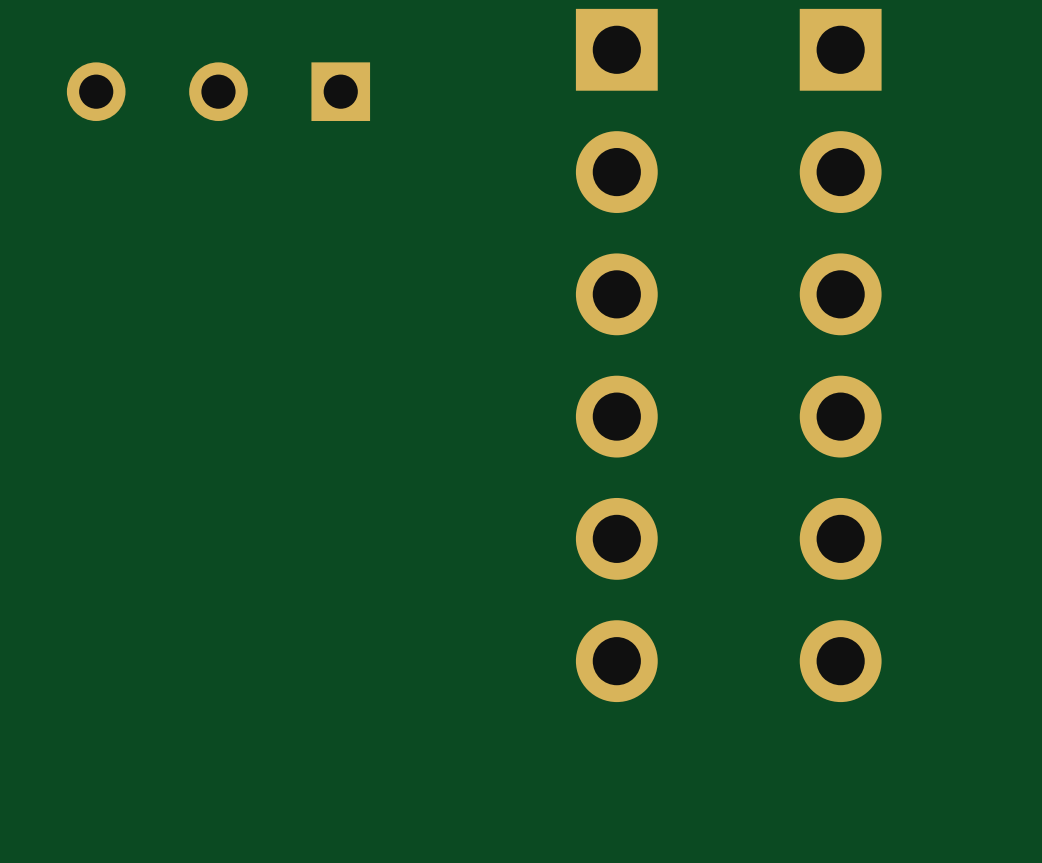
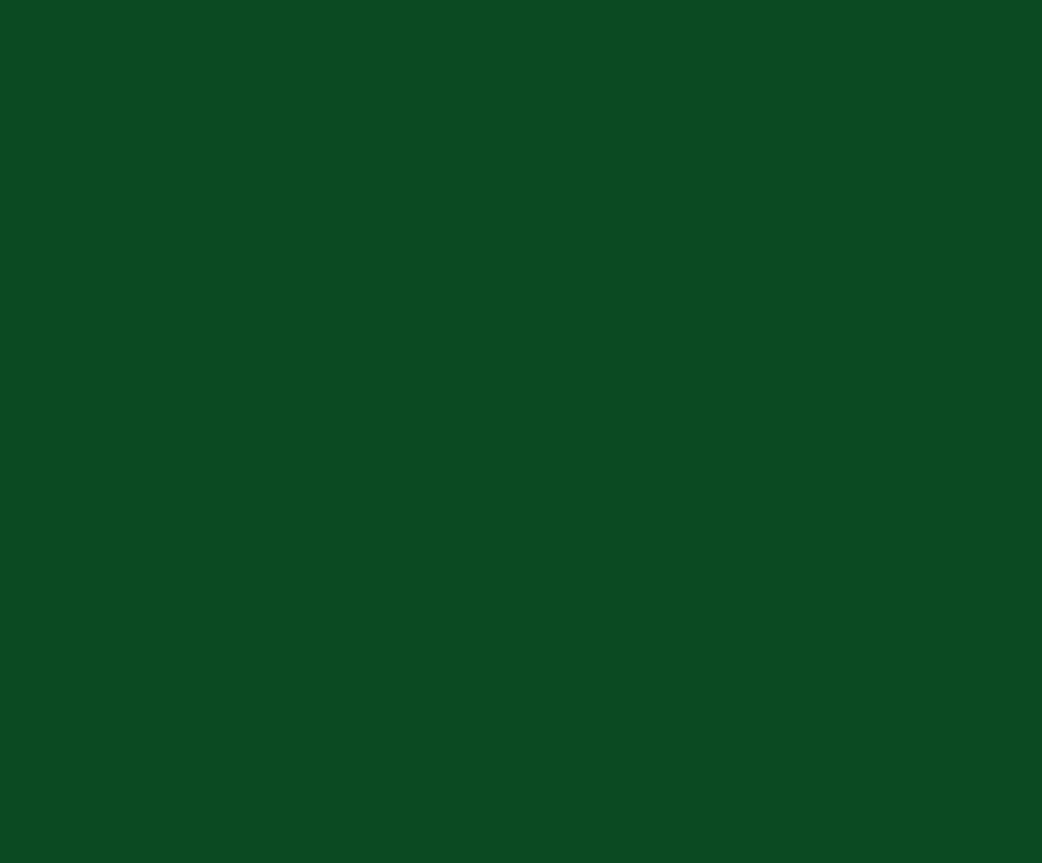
part: (218, 91) -> none
part: (616, 355) -> none
part: (840, 355) -> none

